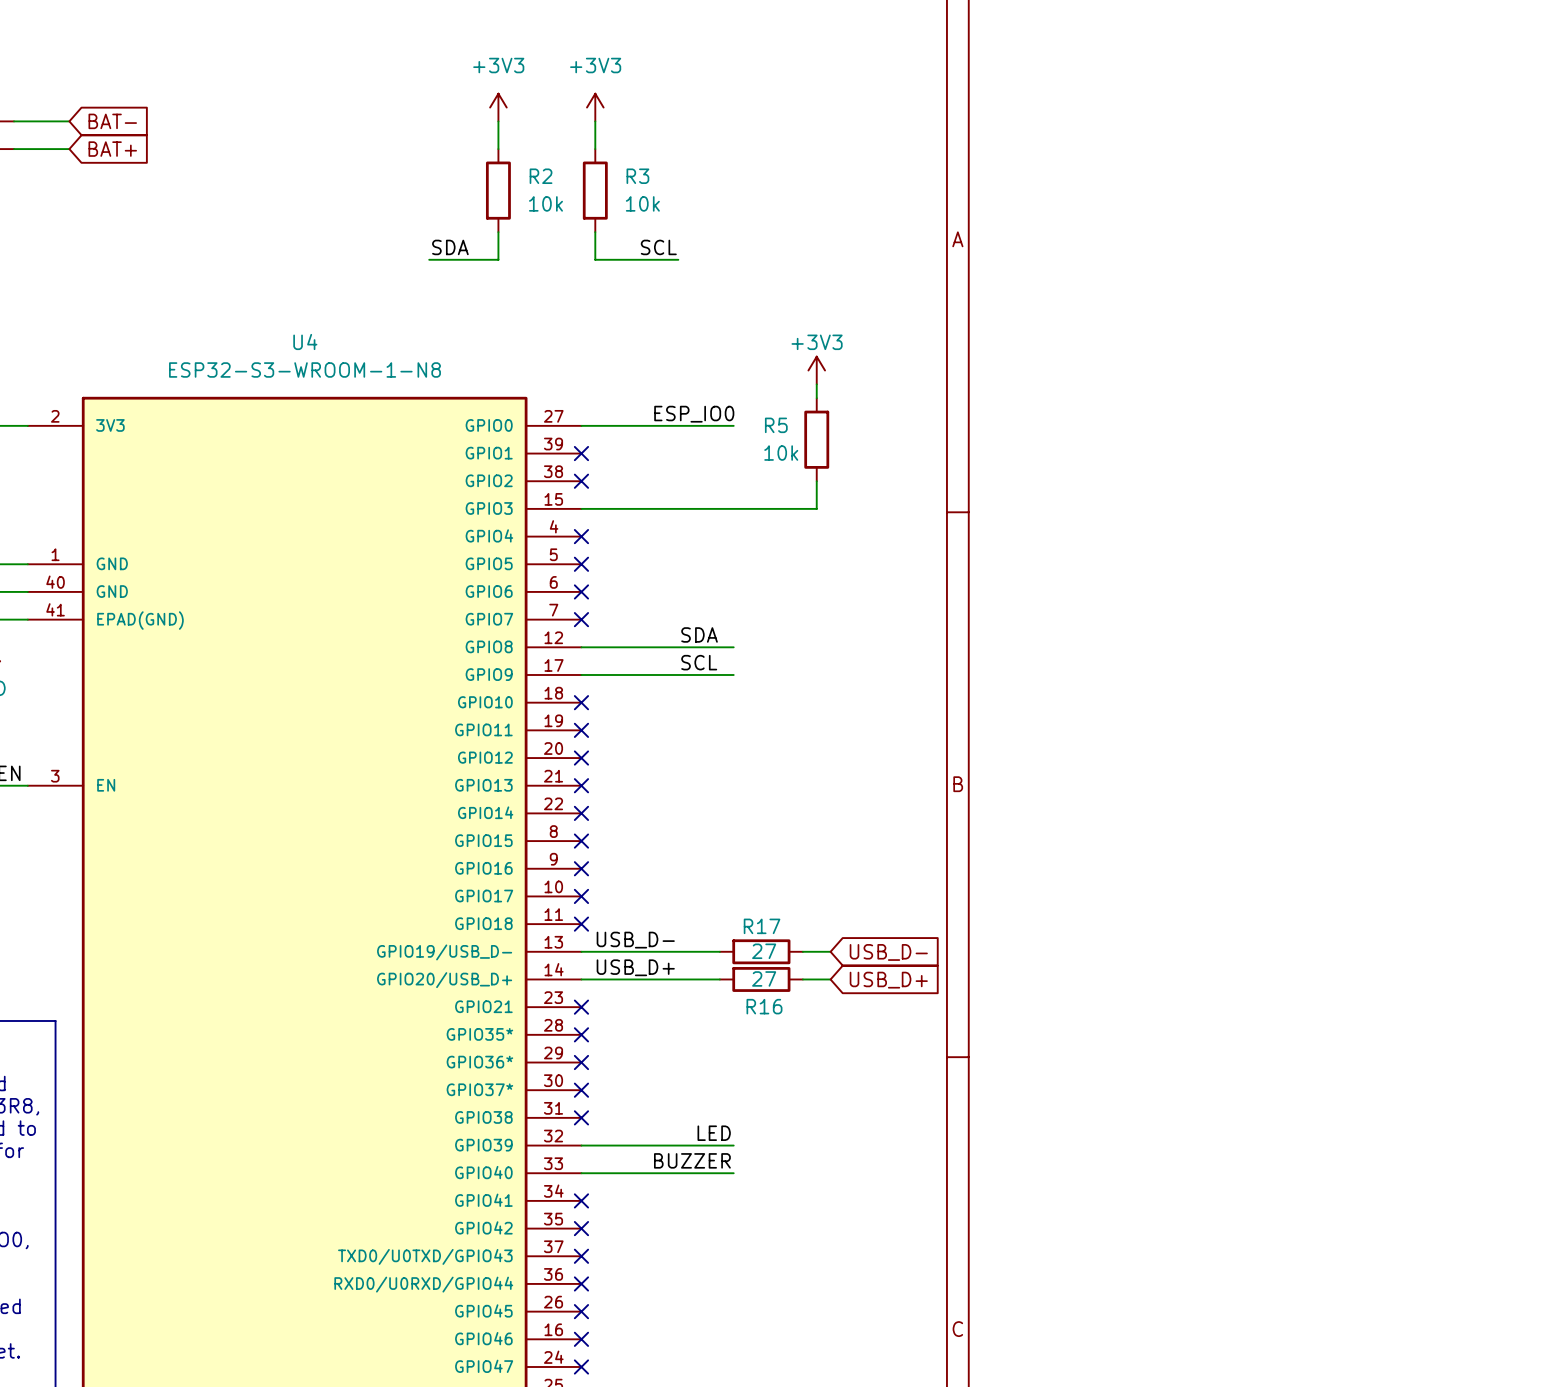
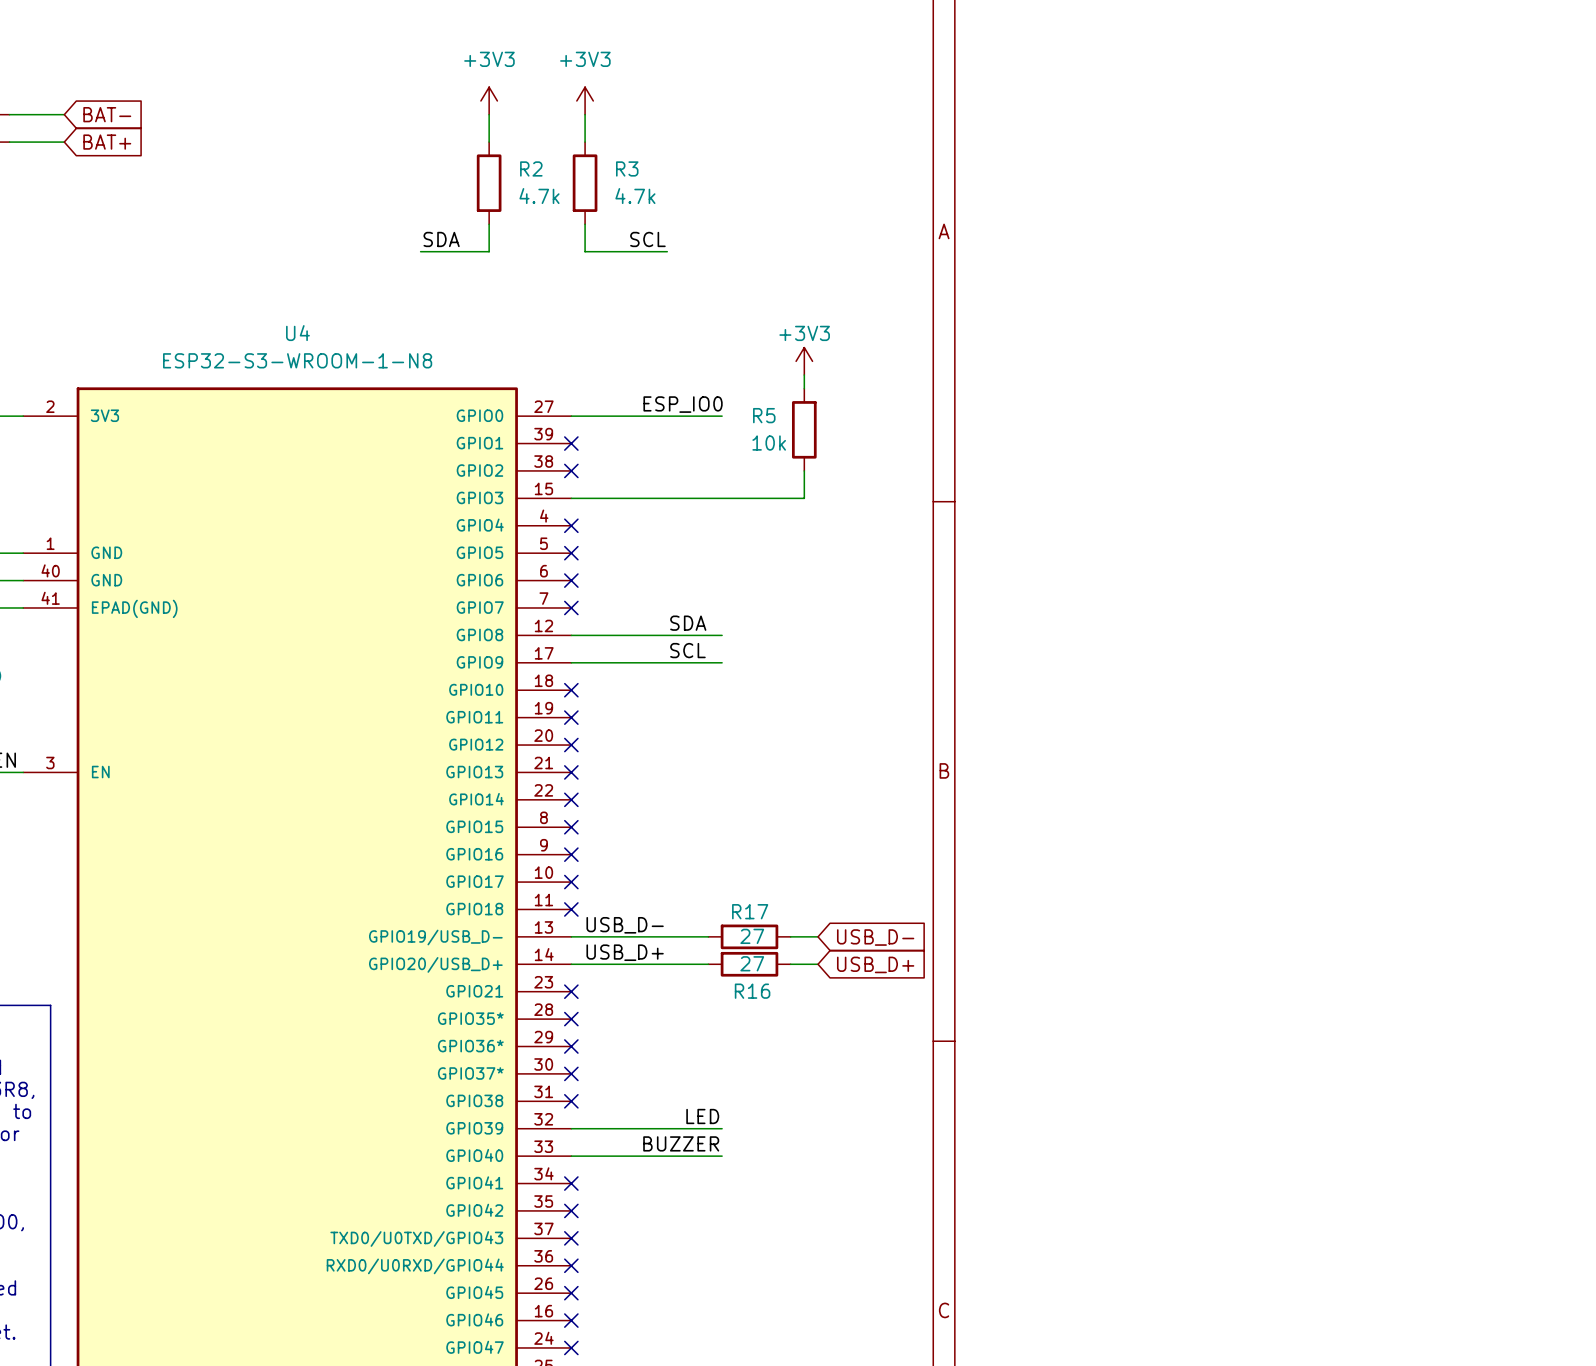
R2 value: 10k (545, 203) -> 4.7k (539, 196)
R3 value: 10k (642, 203) -> 4.7k (635, 196)

